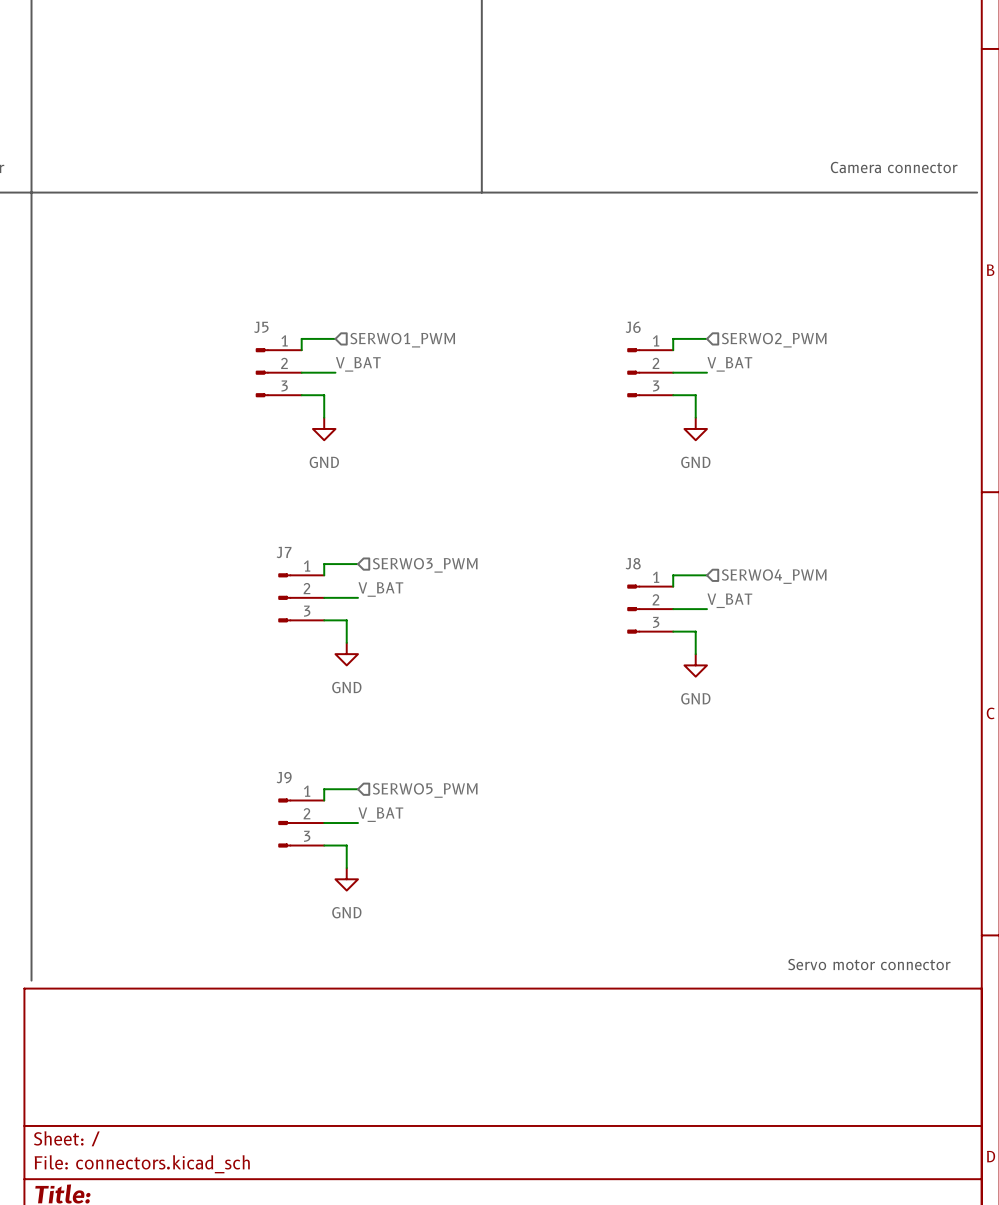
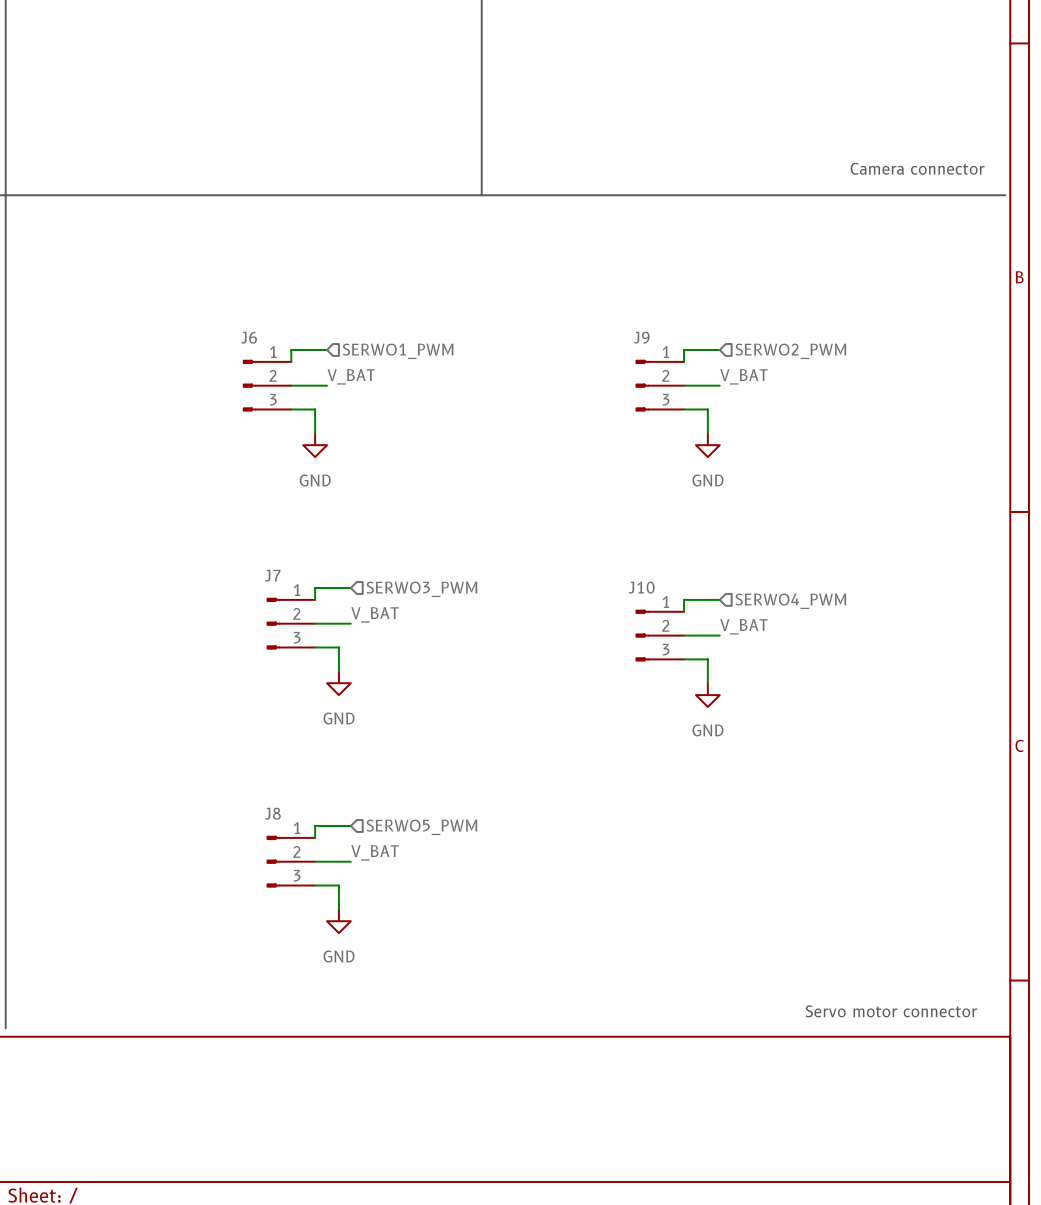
J5 name: J5 (261, 327) -> J6 (248, 337)
J6 name: J6 (633, 327) -> J9 (641, 337)
J8 name: J8 (633, 563) -> J10 (641, 587)
J9 name: J9 (284, 777) -> J8 (272, 813)

